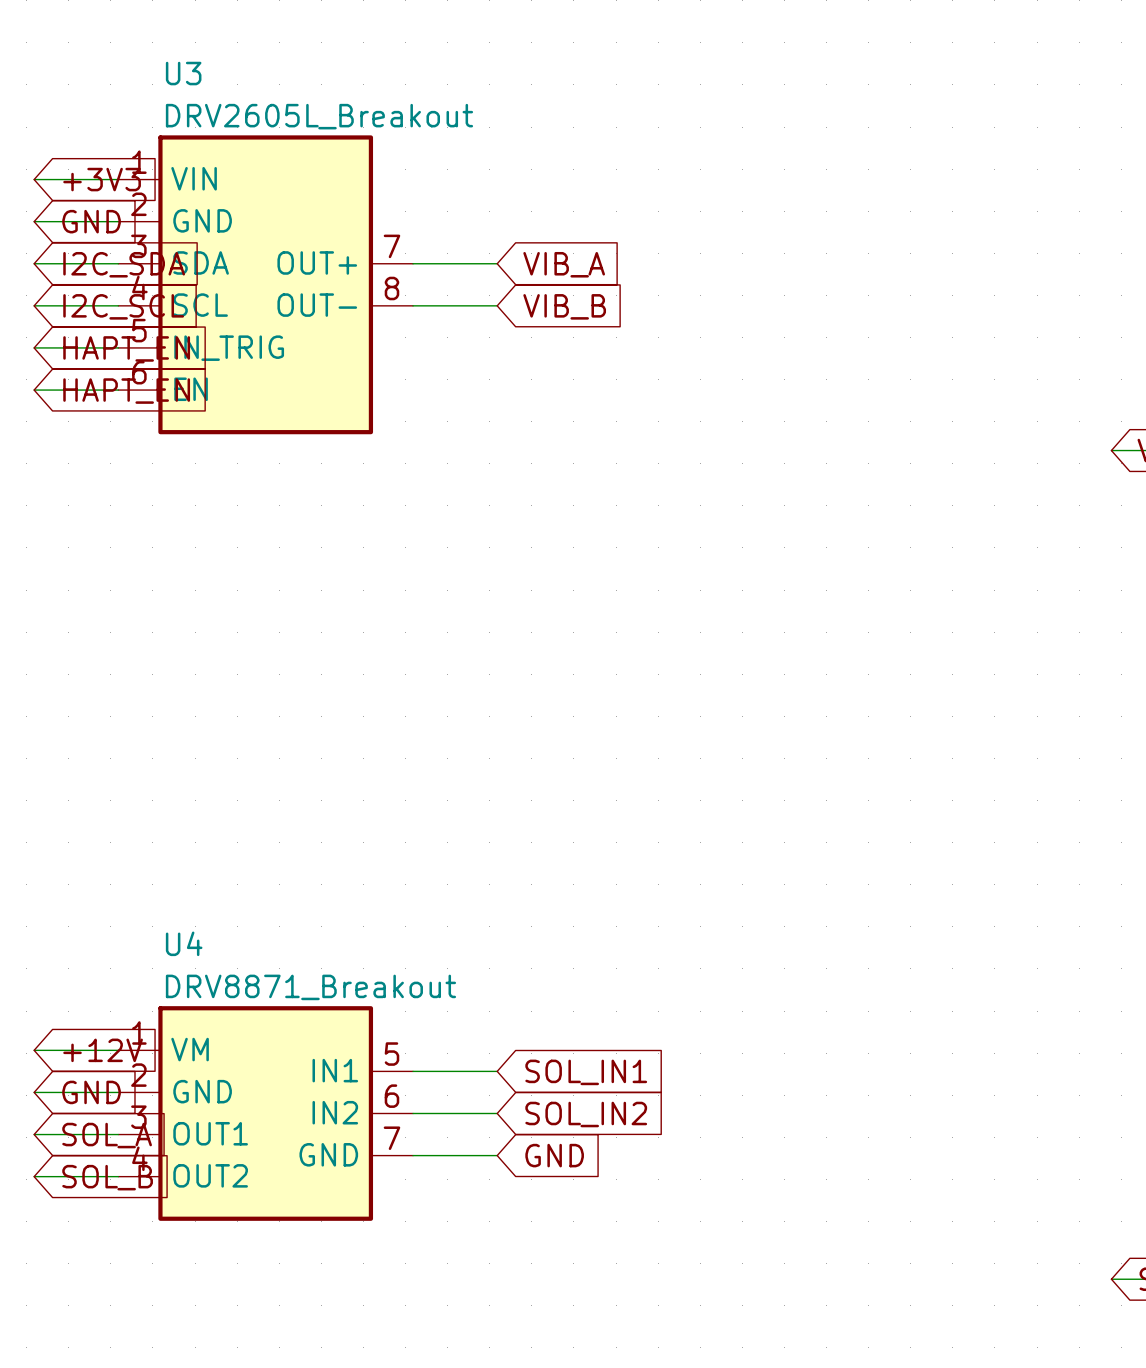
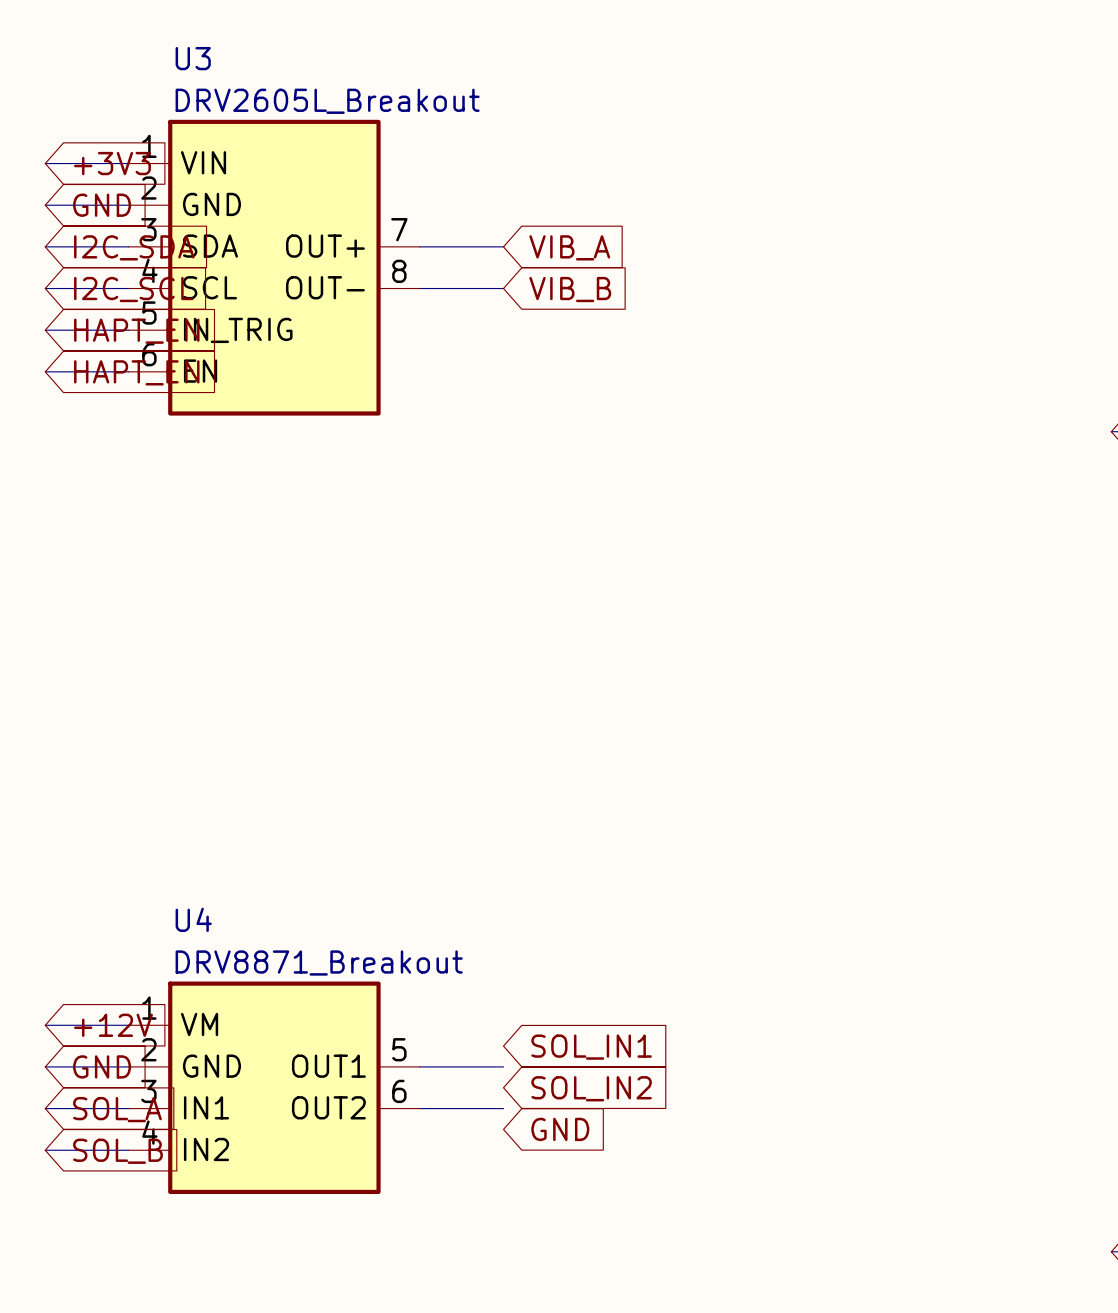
U4 symbol: [118, 1006, 414, 1221] -> [128, 981, 421, 1195]
wire: (413, 1071) (497, 1071) -> none
wire: (413, 1113) (497, 1113) -> (420, 1066) (503, 1066)
wire: (413, 1155) (497, 1155) -> (420, 1108) (503, 1108)

